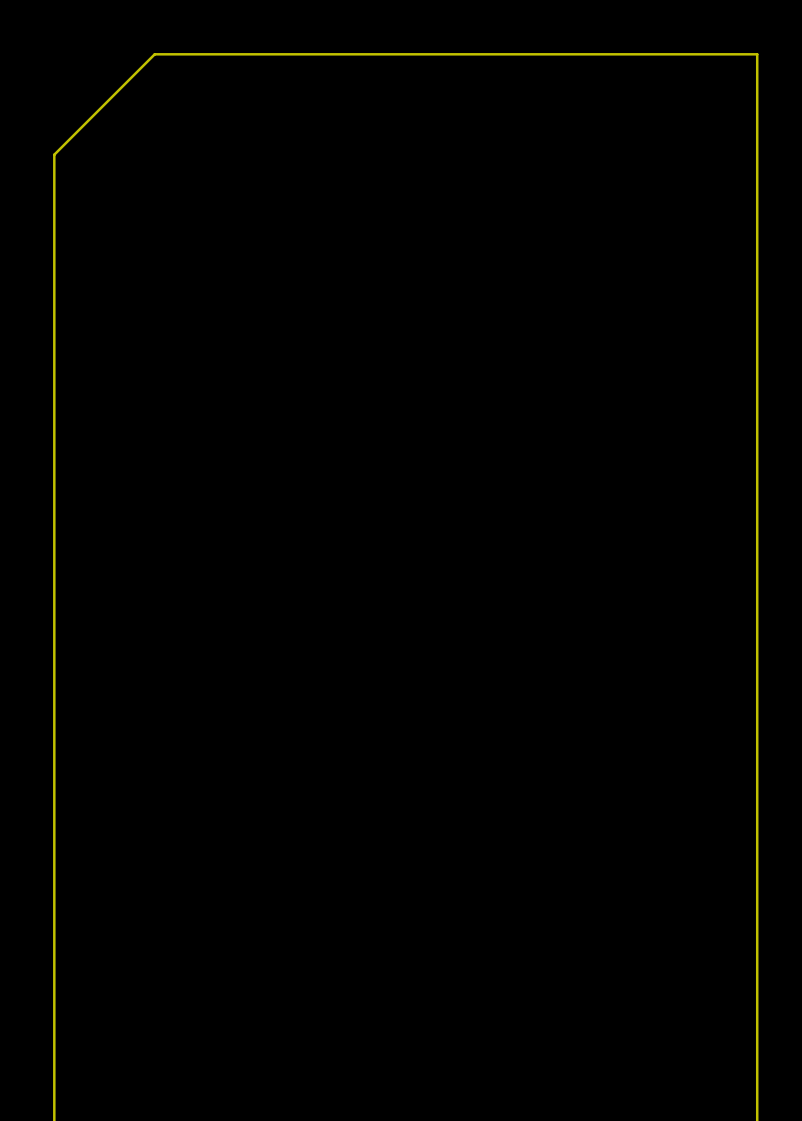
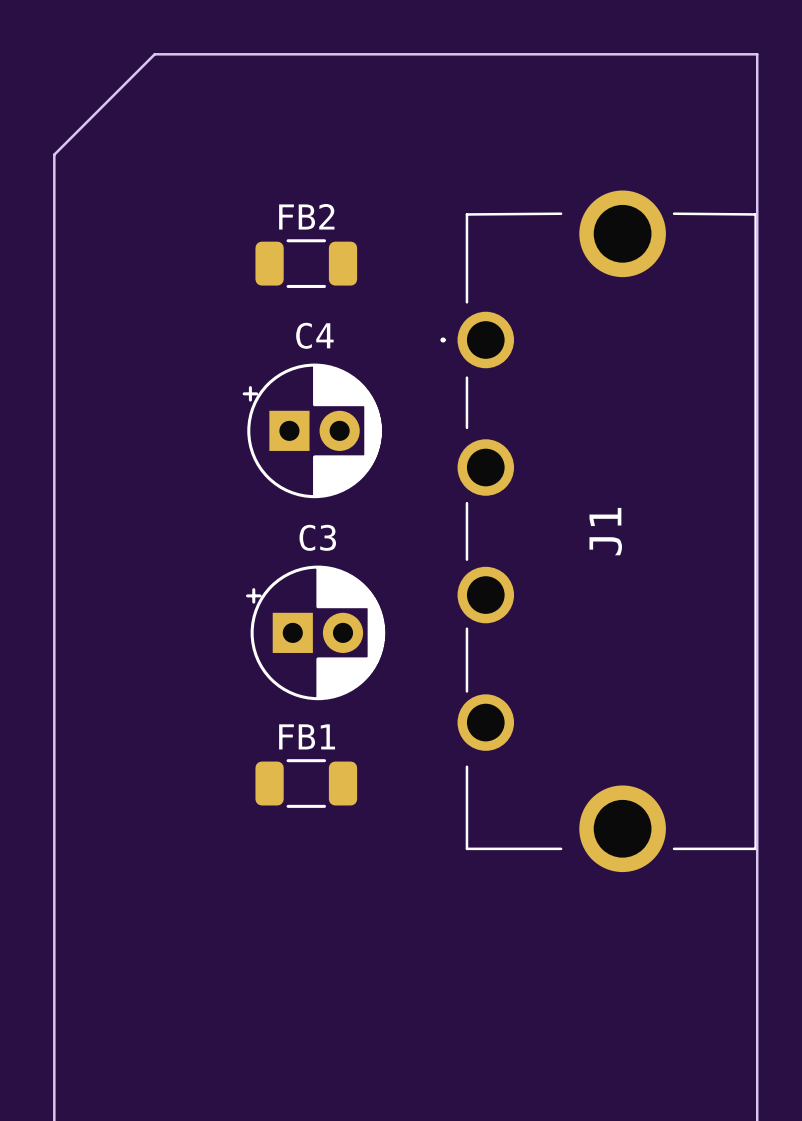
FB2: none -> (306, 263)
C4: none -> (312, 430)
J1: none -> (598, 531)
C3: none -> (315, 632)
FB1: none -> (306, 783)

